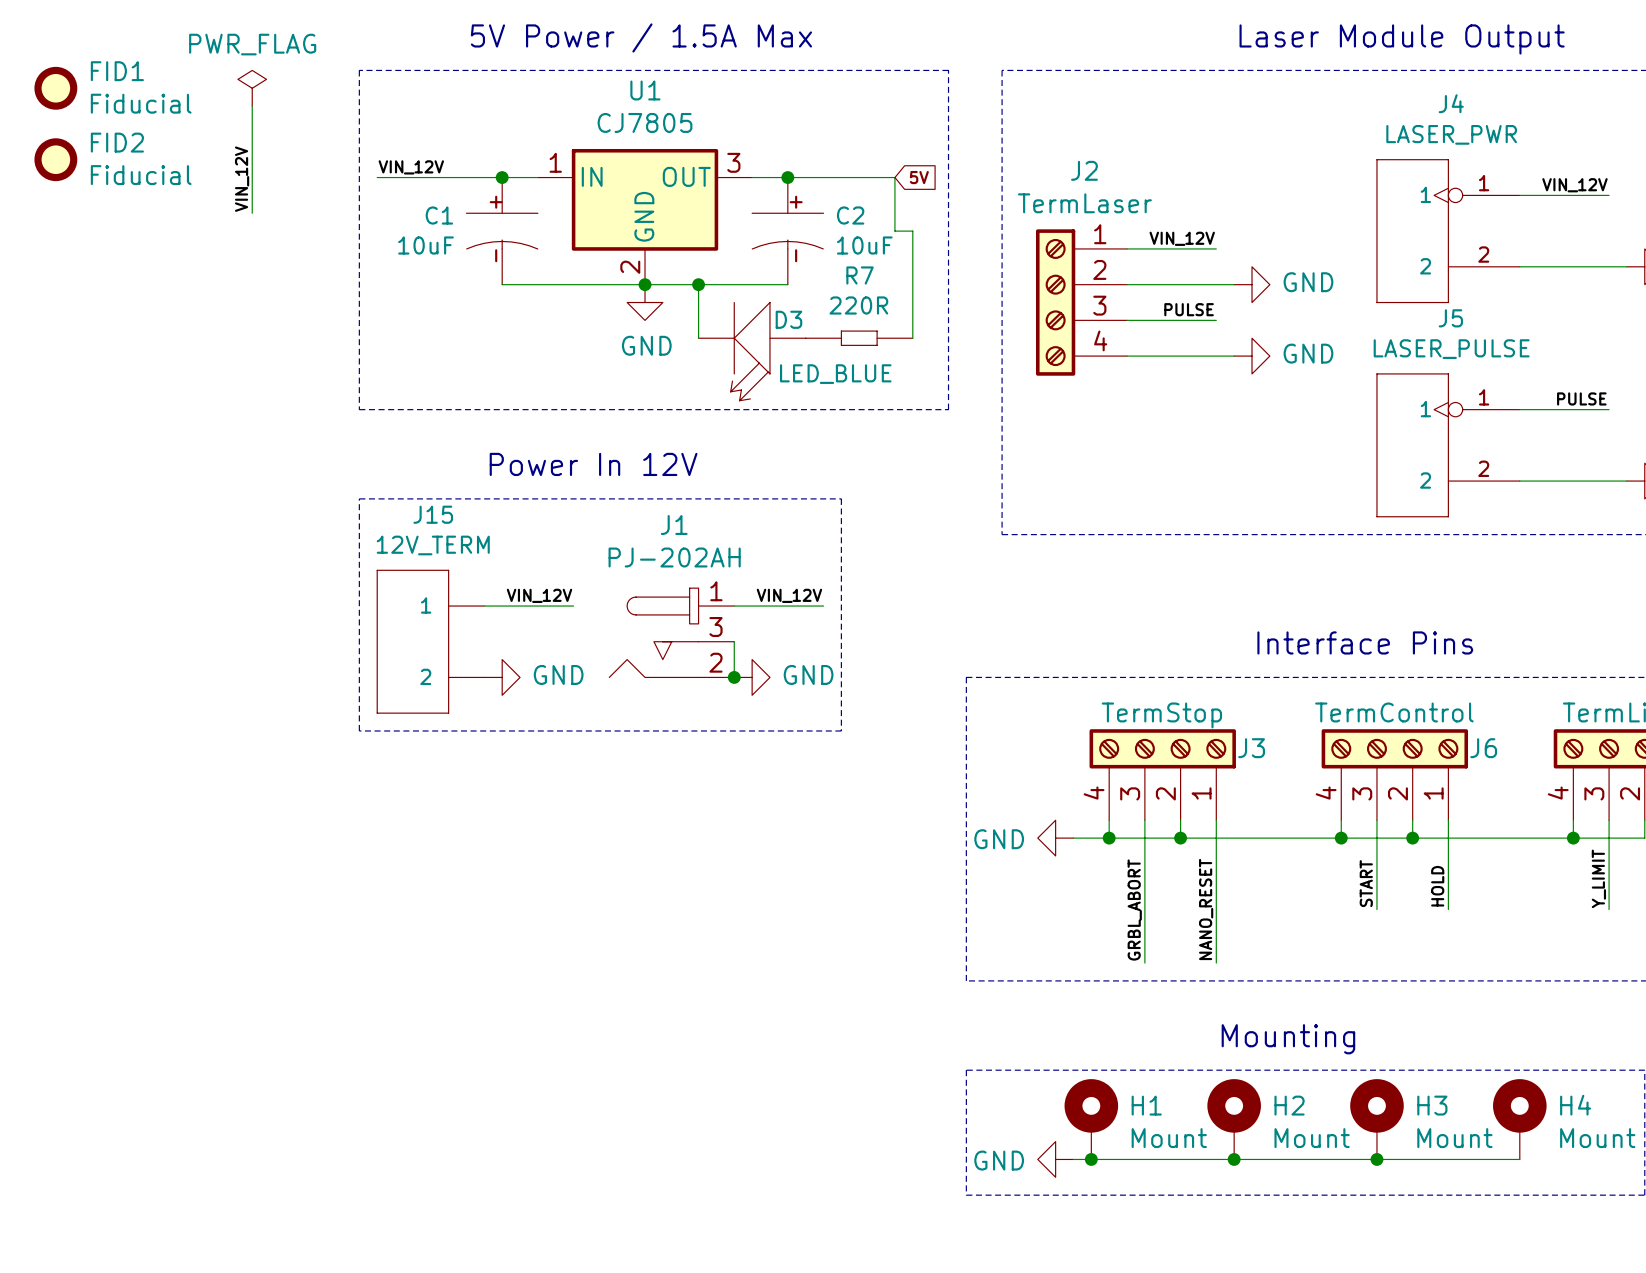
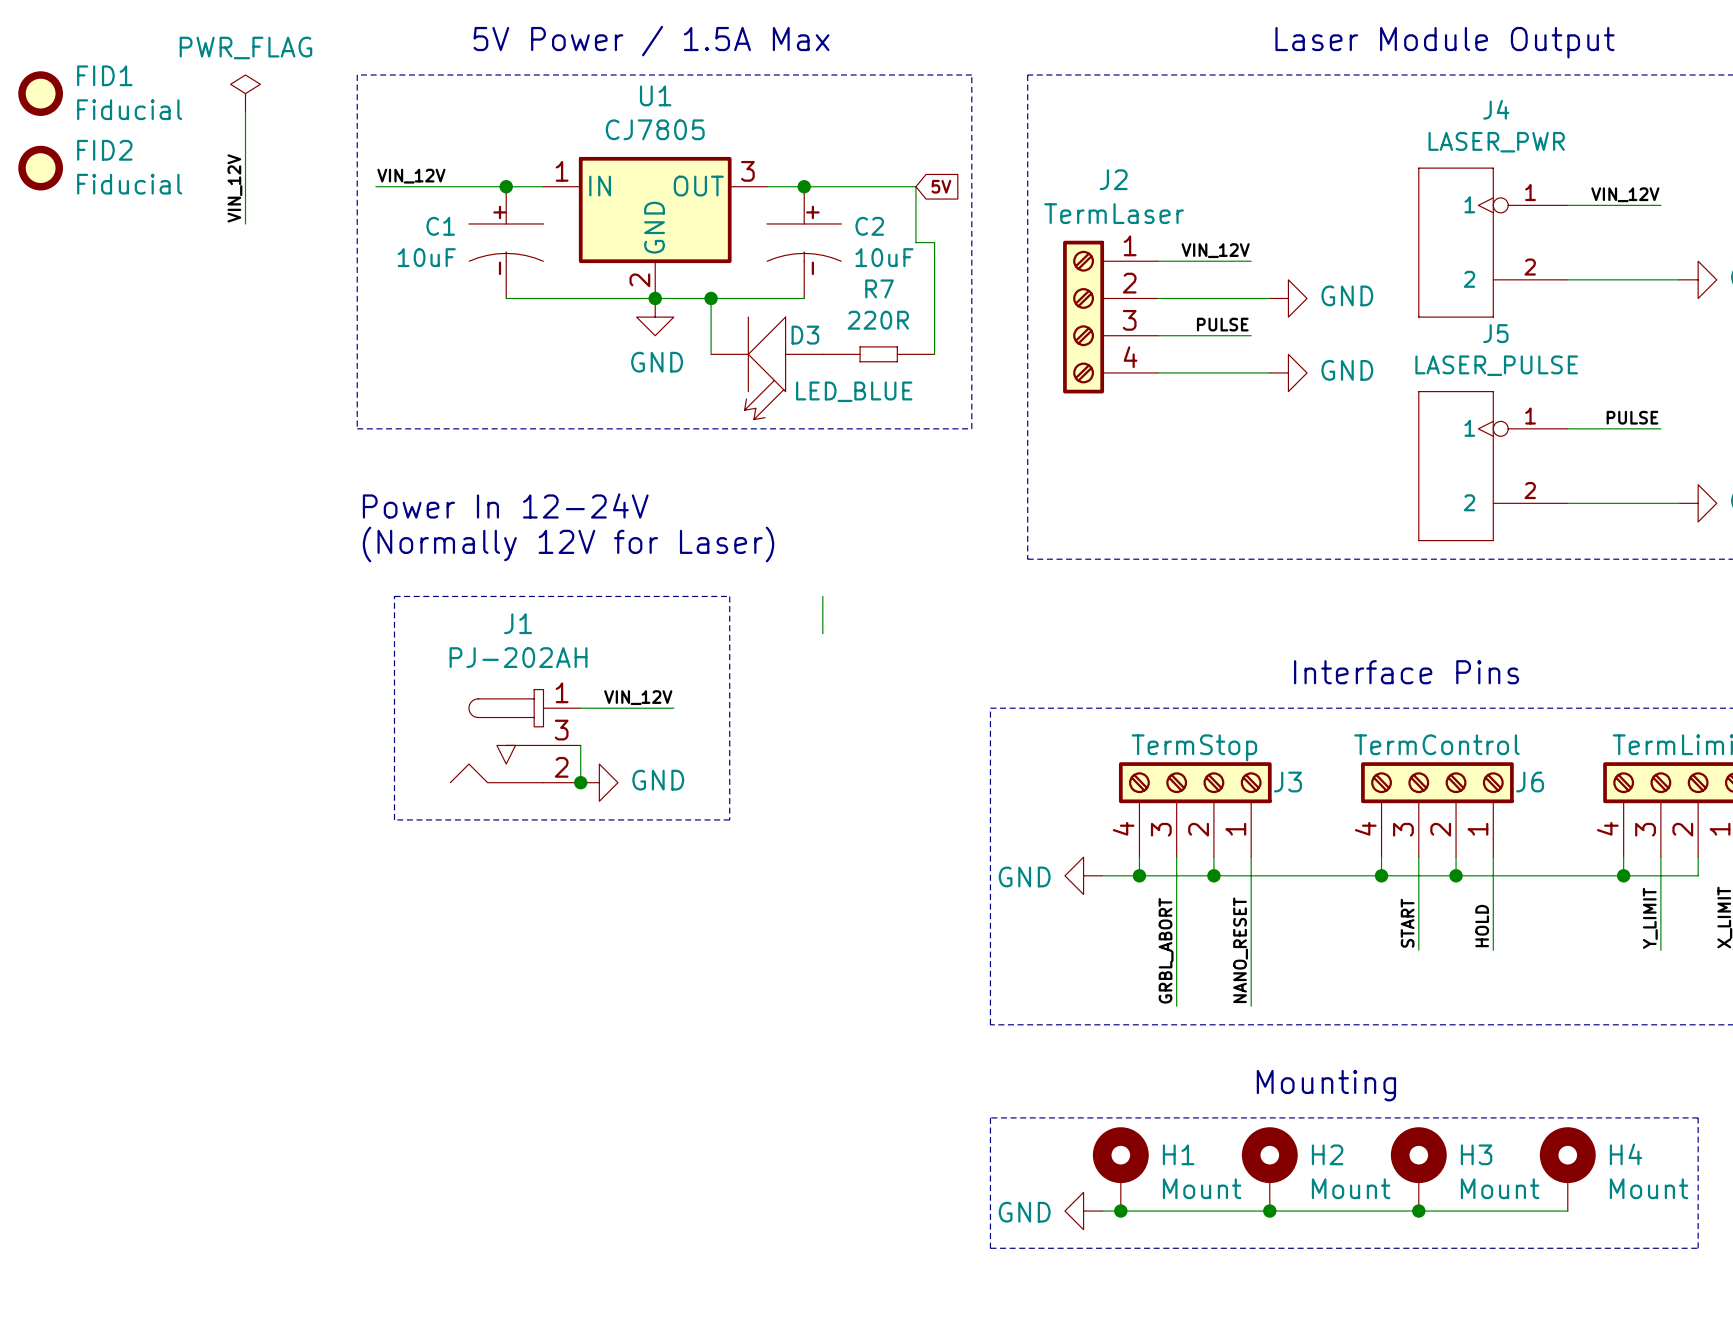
text: Power In 12V (593, 464) -> Power In 12-24V (505, 505)
line: (359, 498) (841, 498) (841, 730) (359, 730) (359, 498) -> none
text: none -> (Normally 12V for Laser) (568, 544)
line: none -> (394, 596) (729, 596) (729, 819) (394, 819) (394, 596)
wire: none -> (822, 596) (822, 633)
label: VIN_12V (539, 595) -> none
label: VIN_12V (789, 595) -> none
wire: (484, 606) (573, 606) -> none
wire: (734, 606) (823, 606) -> (580, 708) (673, 708)
J1 position: (671, 632) -> (515, 736)
J15: 12V_TERM (430, 641) -> none
wire: (734, 641) (734, 677) -> (580, 745) (580, 782)
label: none -> VIN_12V (638, 697)
power symbol: GND (502, 677) -> none
junction: (734, 677) -> none
power symbol: GND (752, 677) -> none
junction: none -> (580, 782)
power symbol: none -> GND (599, 782)

